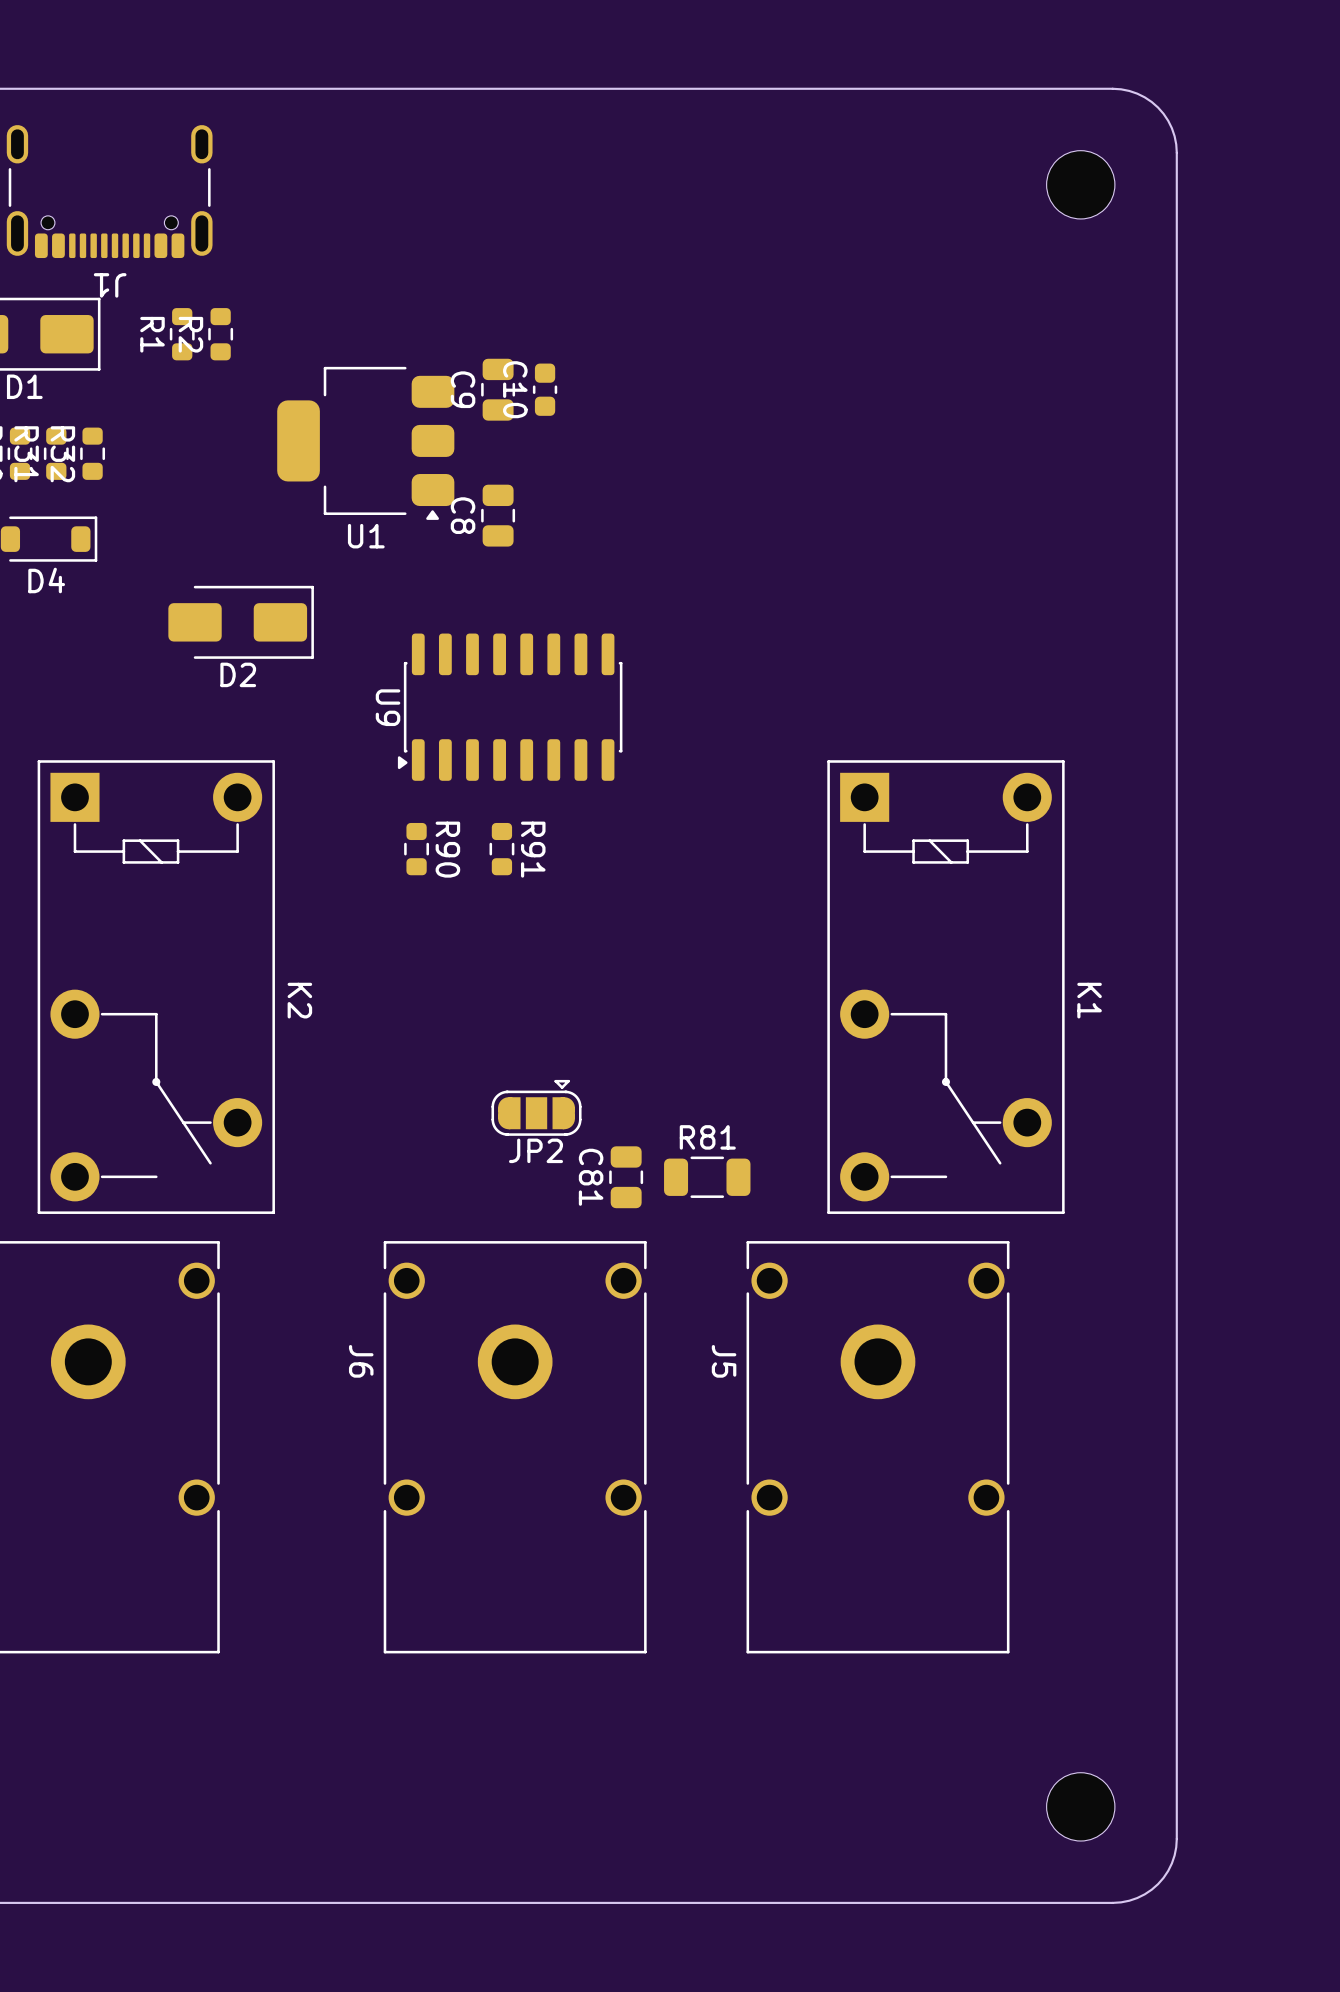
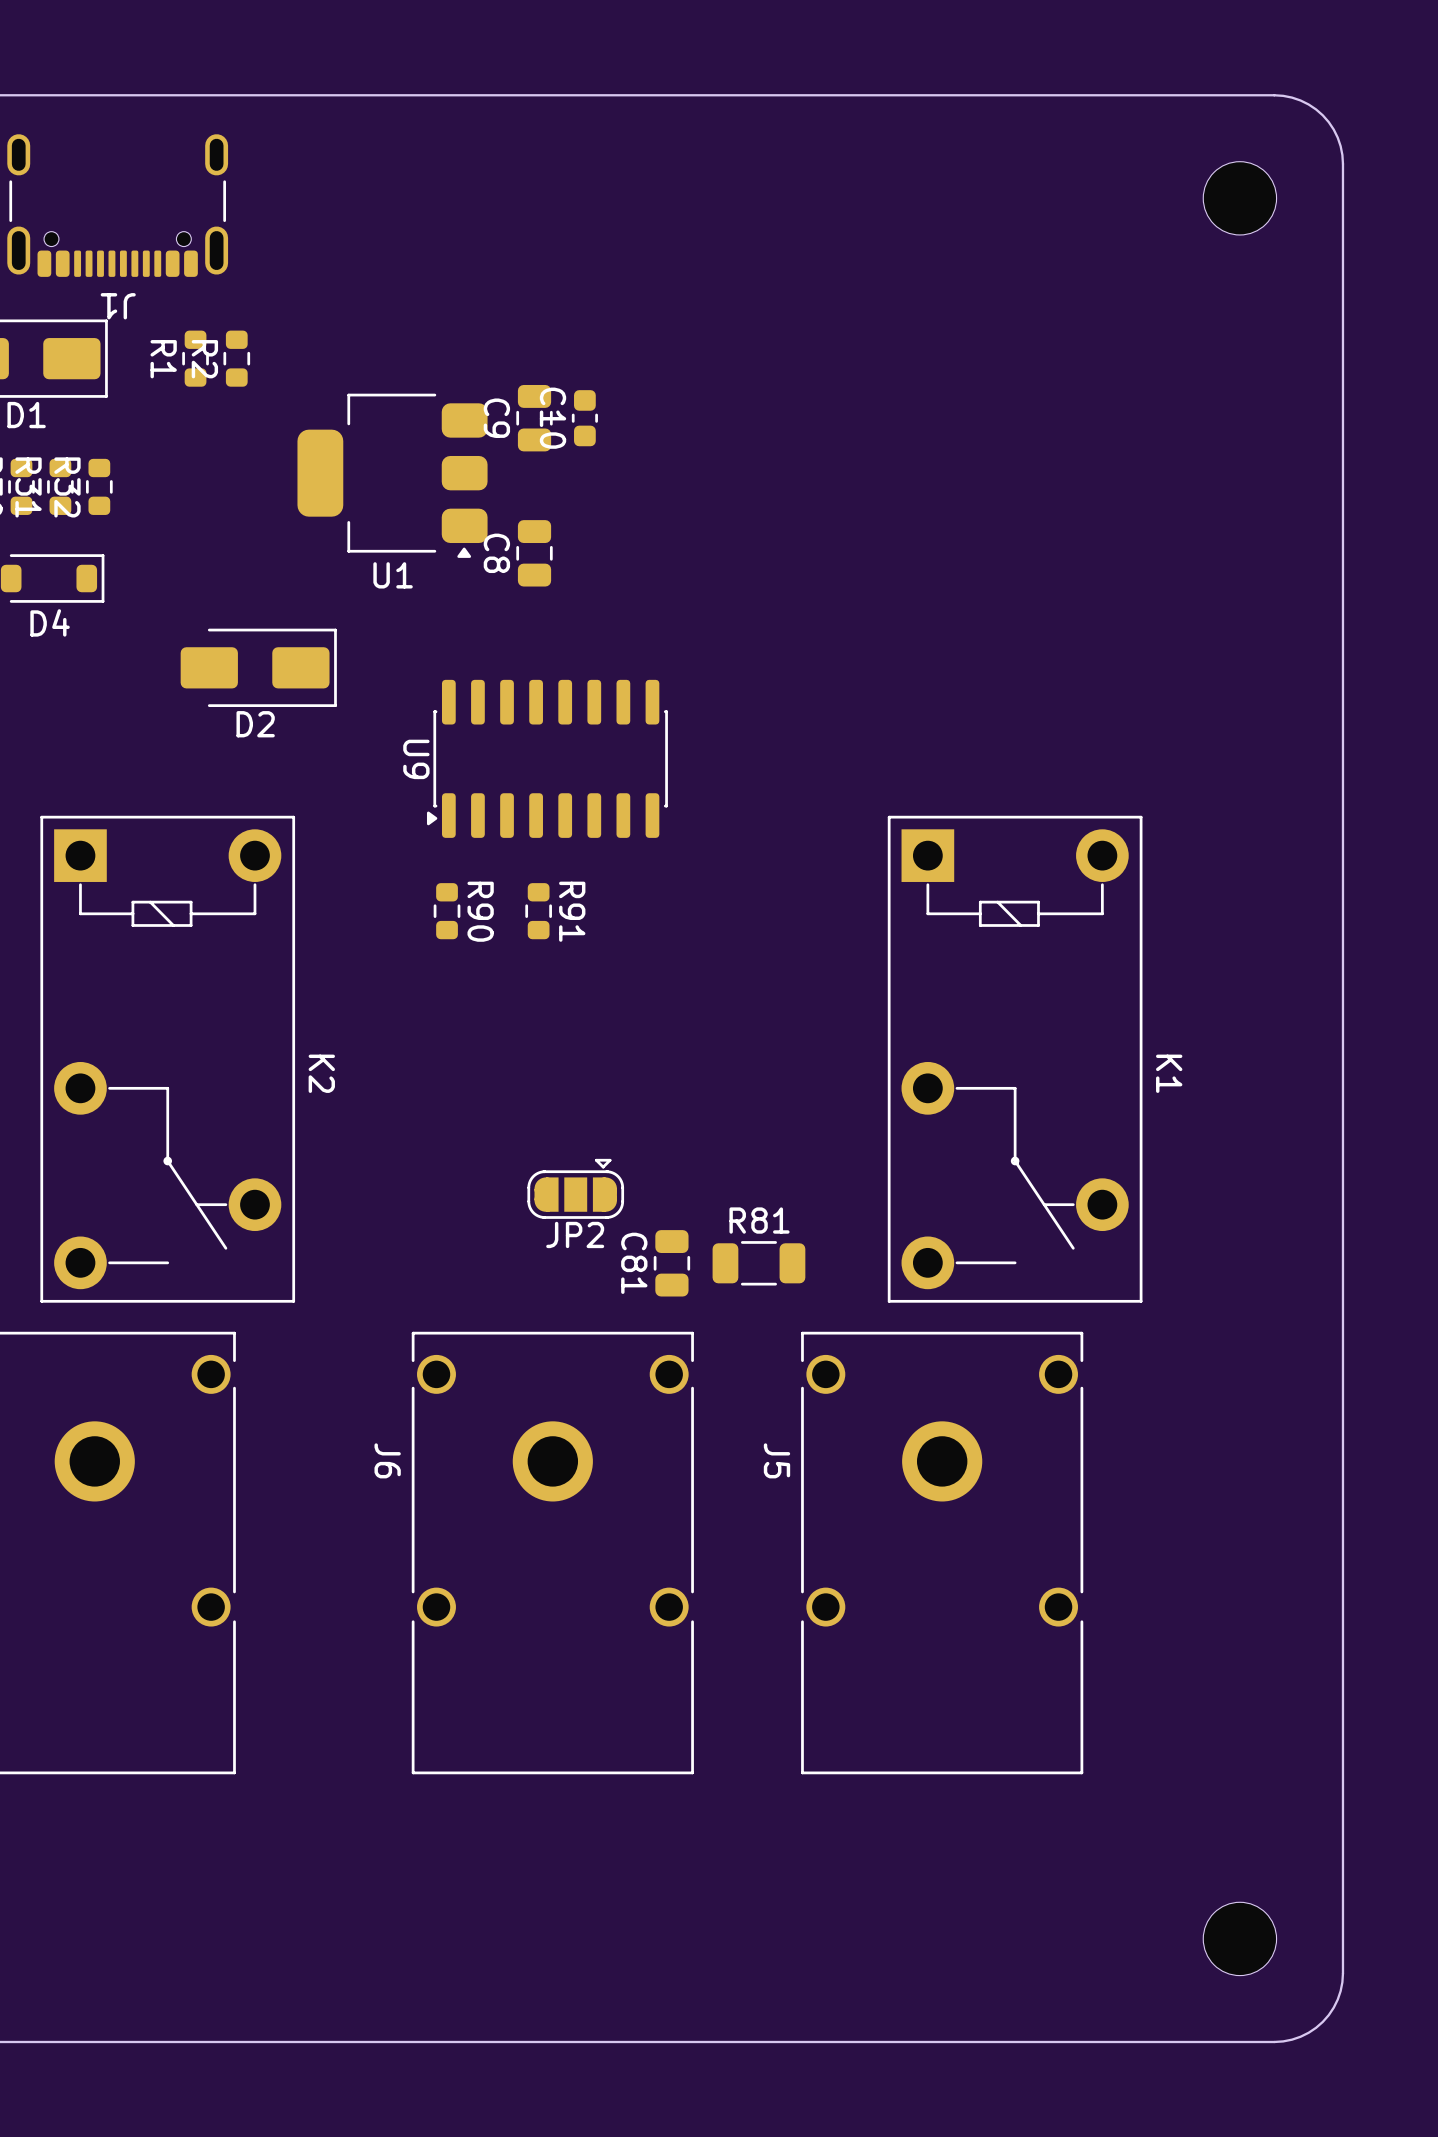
board edge: (1112, 88) (1137, 93) (1158, 107) (1171, 128) (1176, 152) (1176, 1838) (1171, 1863) (1158, 1884) (1137, 1898) (1112, 1902) -> (1194, 95) (1274, 95) (1300, 100) (1316, 109) (1328, 122) (1337, 137) (1342, 163) (1342, 1982) (1337, 1999) (1328, 2015) (1316, 2027) (1300, 2036) (1274, 2042) (1194, 2042)
part position: (1080, 184) -> (1239, 198)
part position: (1080, 1806) -> (1239, 1938)

